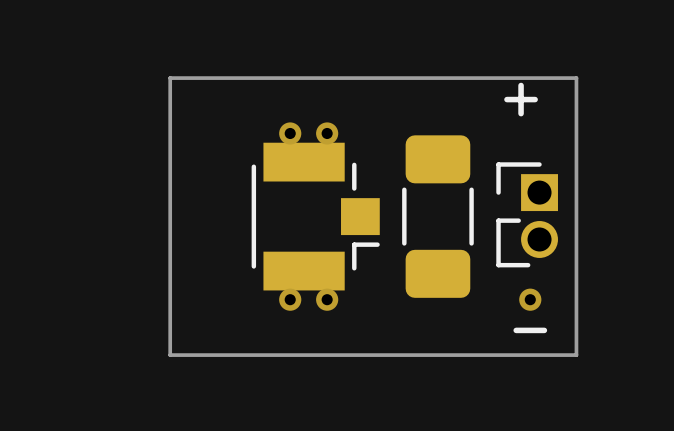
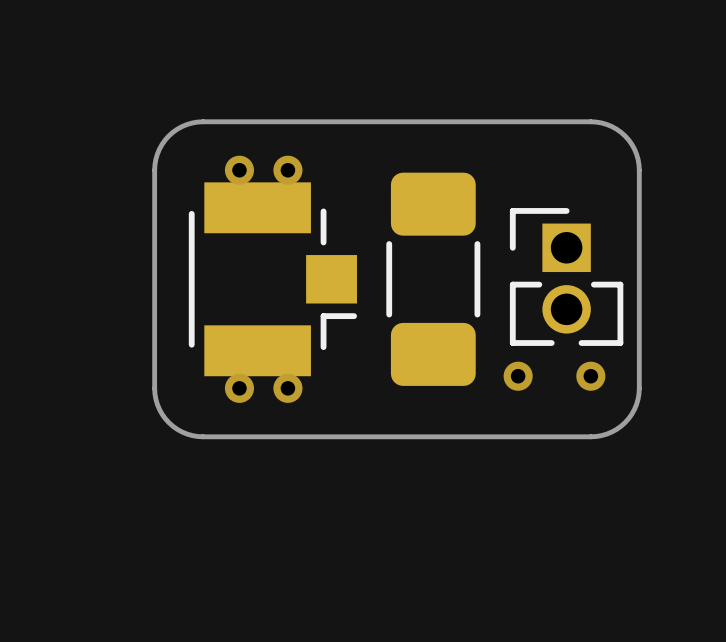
board edge: (170, 78) (170, 355) (576, 355) (576, 78) (170, 78) -> (203, 121) (187, 124) (172, 132) (162, 144) (154, 164) (154, 393) (162, 414) (177, 429) (187, 434) (203, 436) (590, 436) (606, 434) (616, 429) (631, 414) (638, 399) (639, 388) (639, 170) (636, 154) (631, 144) (616, 129) (601, 122) (590, 121) (203, 121)
text: + (521, 99) -> none
part footprint: [496, 162, 558, 268] -> [509, 208, 624, 346]
via: none -> (518, 376)
via: none -> (590, 376)
via: (530, 299) -> none
text: - (530, 330) -> none

